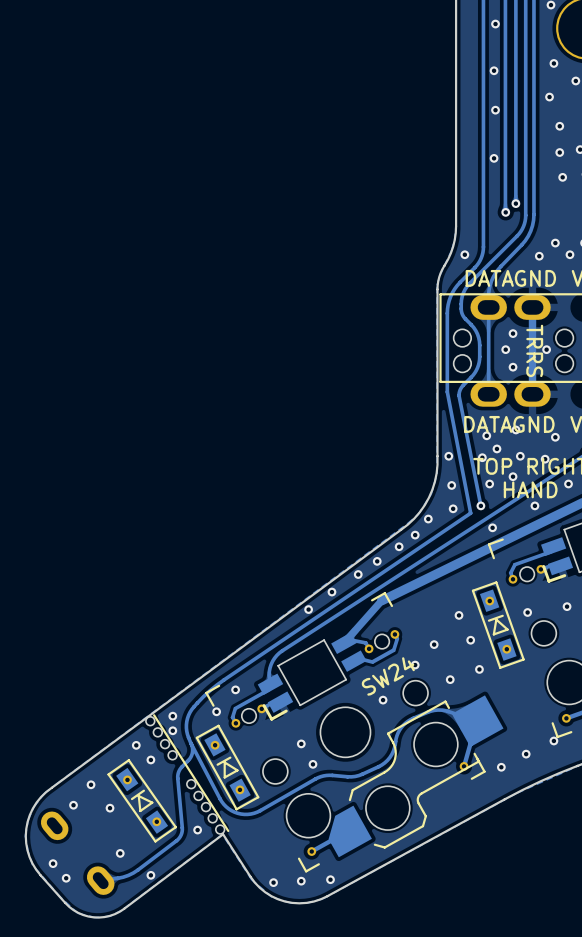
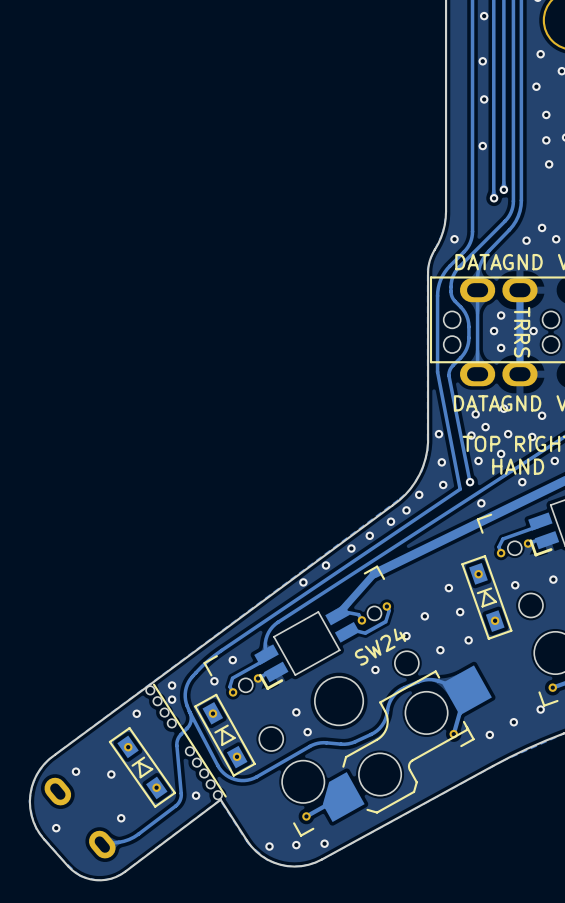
via: (150, 759) -> none
via: (91, 784) -> none
via: (150, 875) -> none
via: (66, 878) -> none

